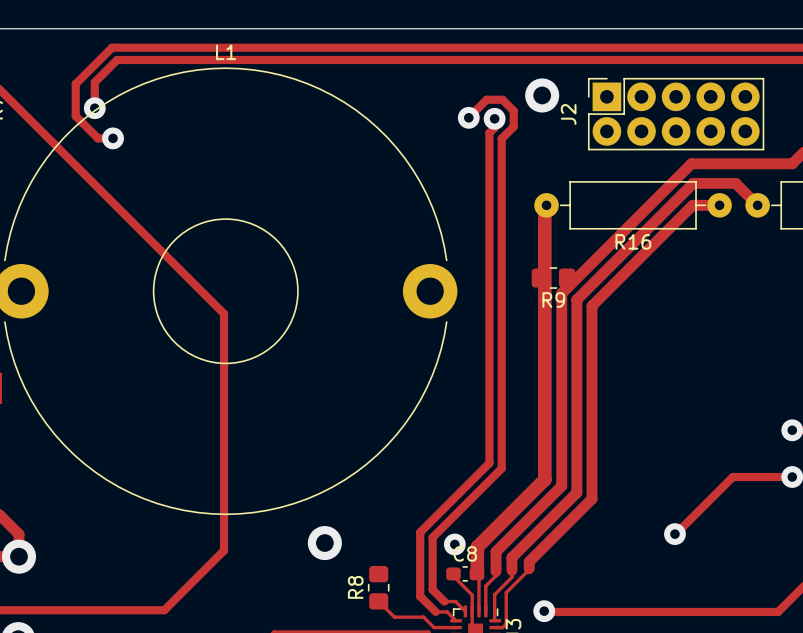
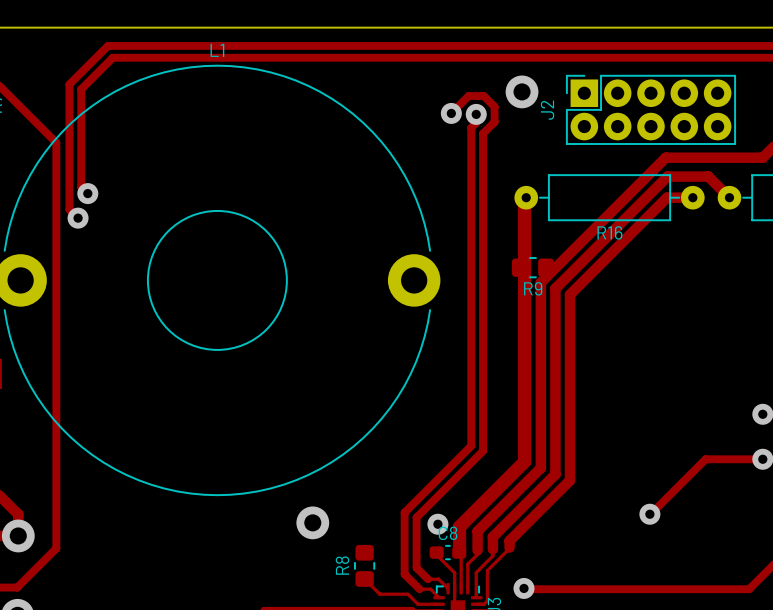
track: (94, 82) (94, 108) -> (91, 79) (81, 89) (81, 187) (87, 193)
track: (75, 84) (75, 116) (98, 138) (113, 138) -> (72, 80) (69, 84) (69, 209) (78, 218)
via: (94, 108) -> none
via: (113, 138) -> none
track: (58, 148) (224, 313) (224, 550) (164, 610) (17, 610) -> (56, 142) (56, 548) (17, 587)
via: none -> (87, 193)
via: none -> (78, 218)

